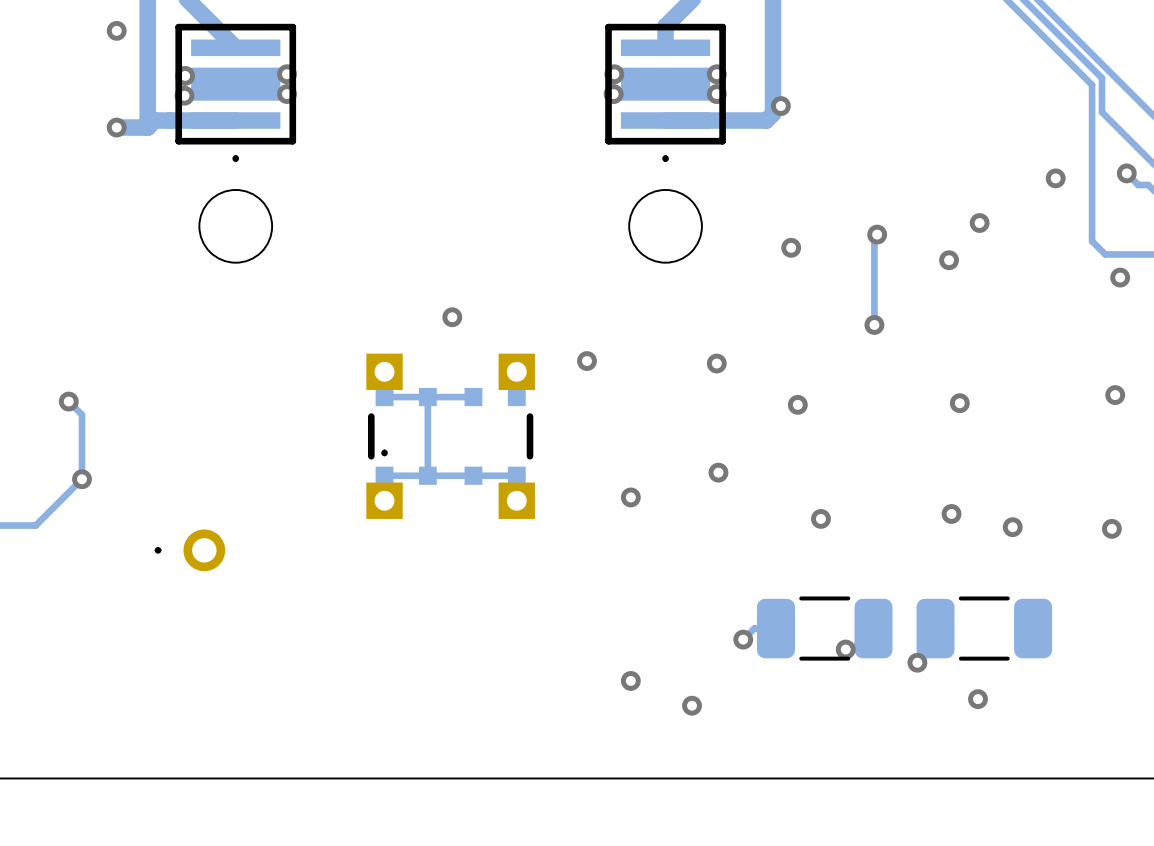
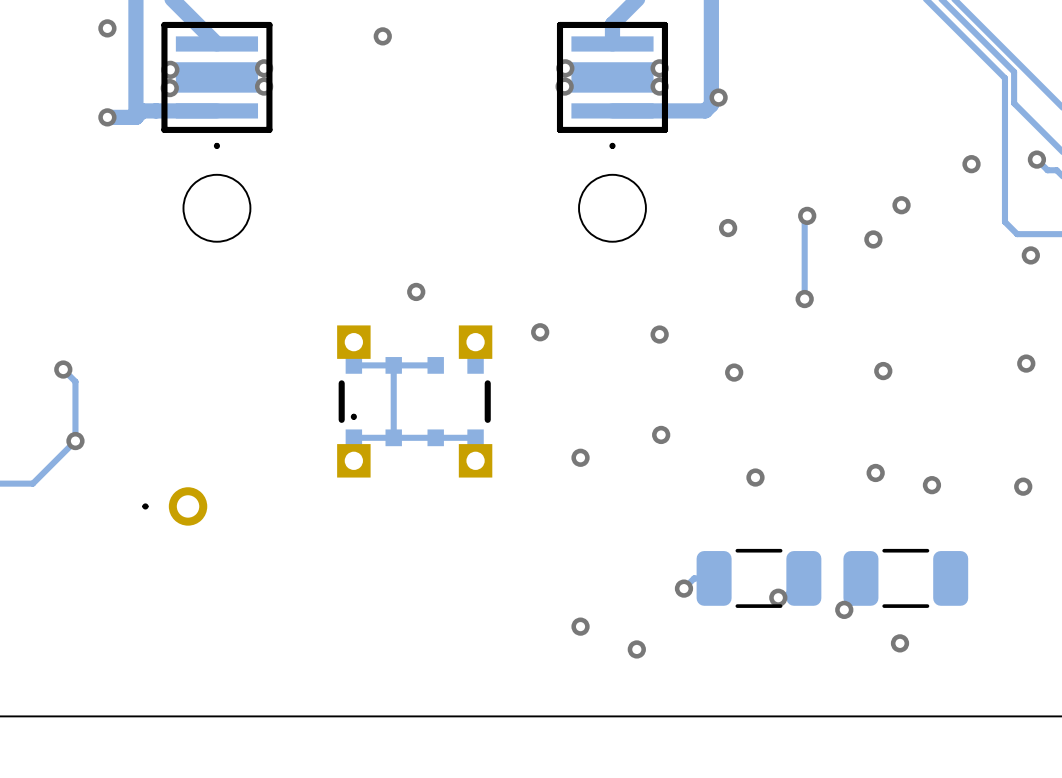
via: none -> (382, 36)

